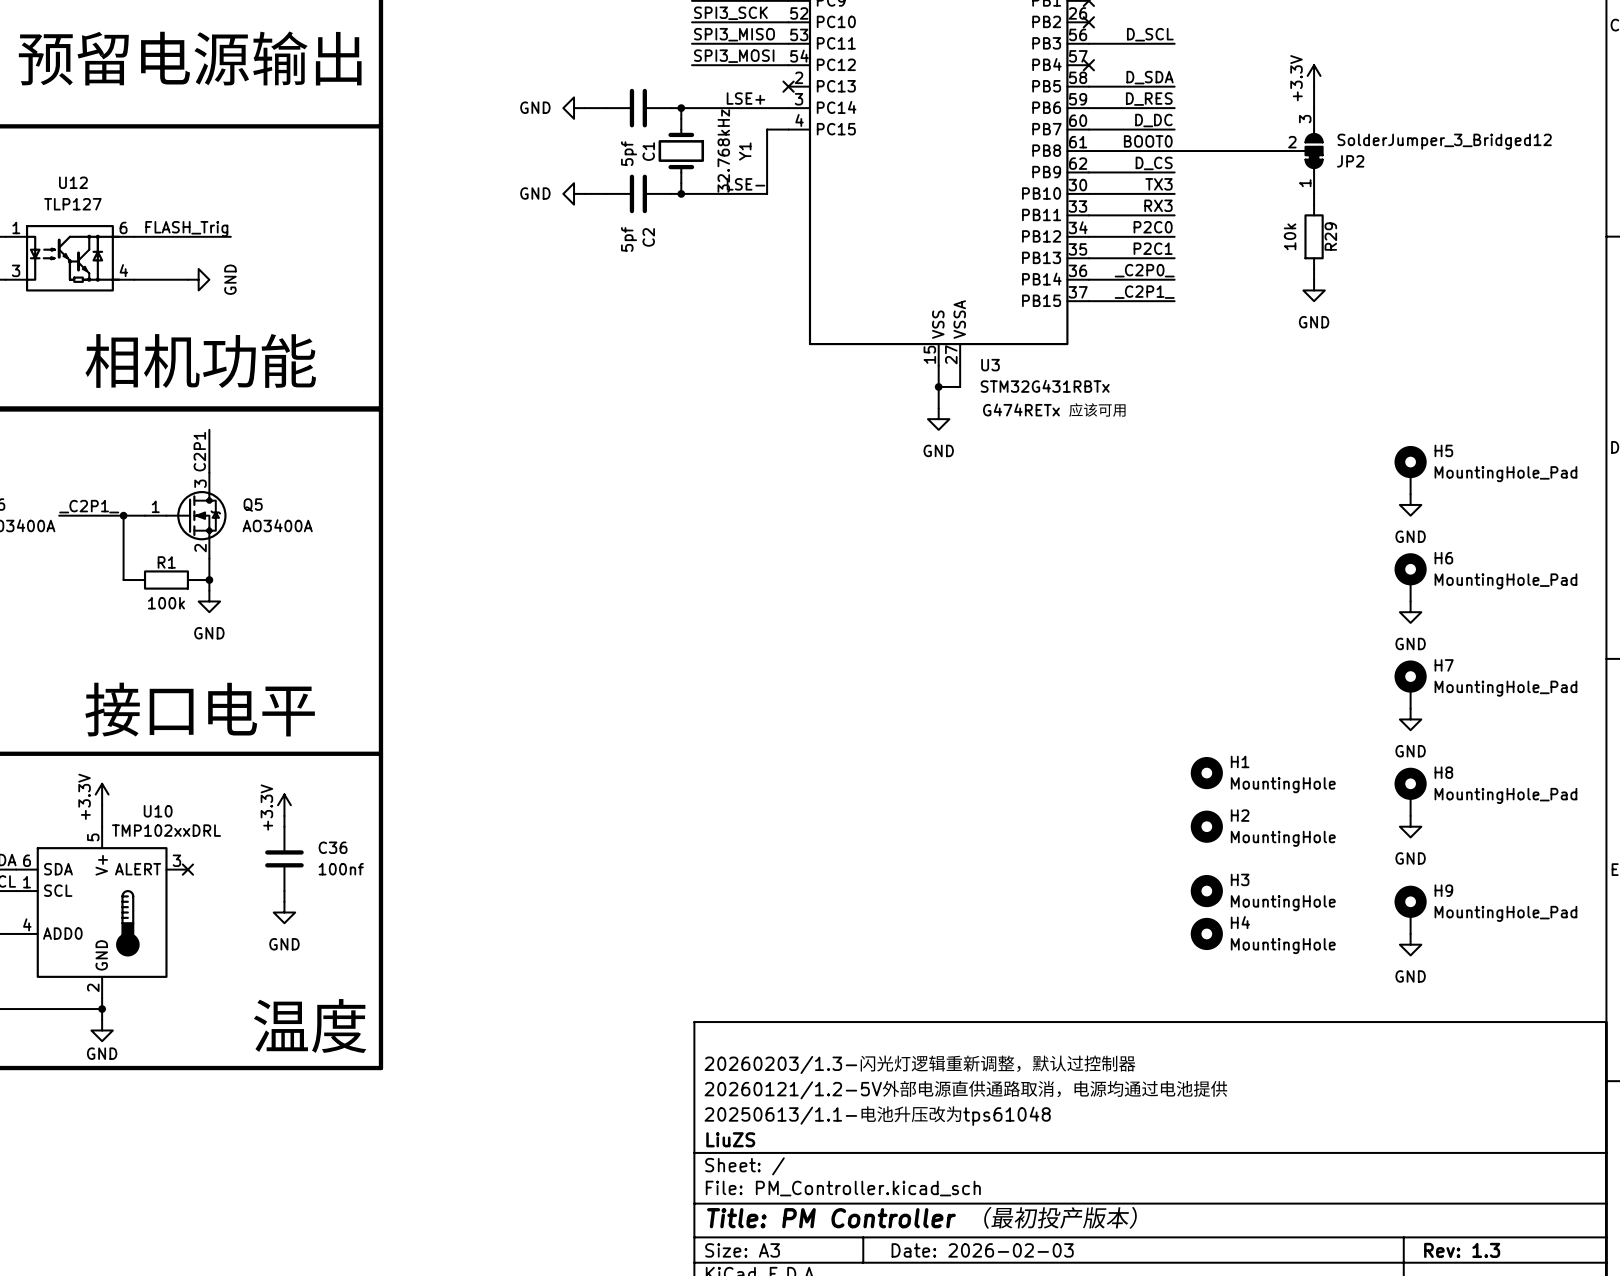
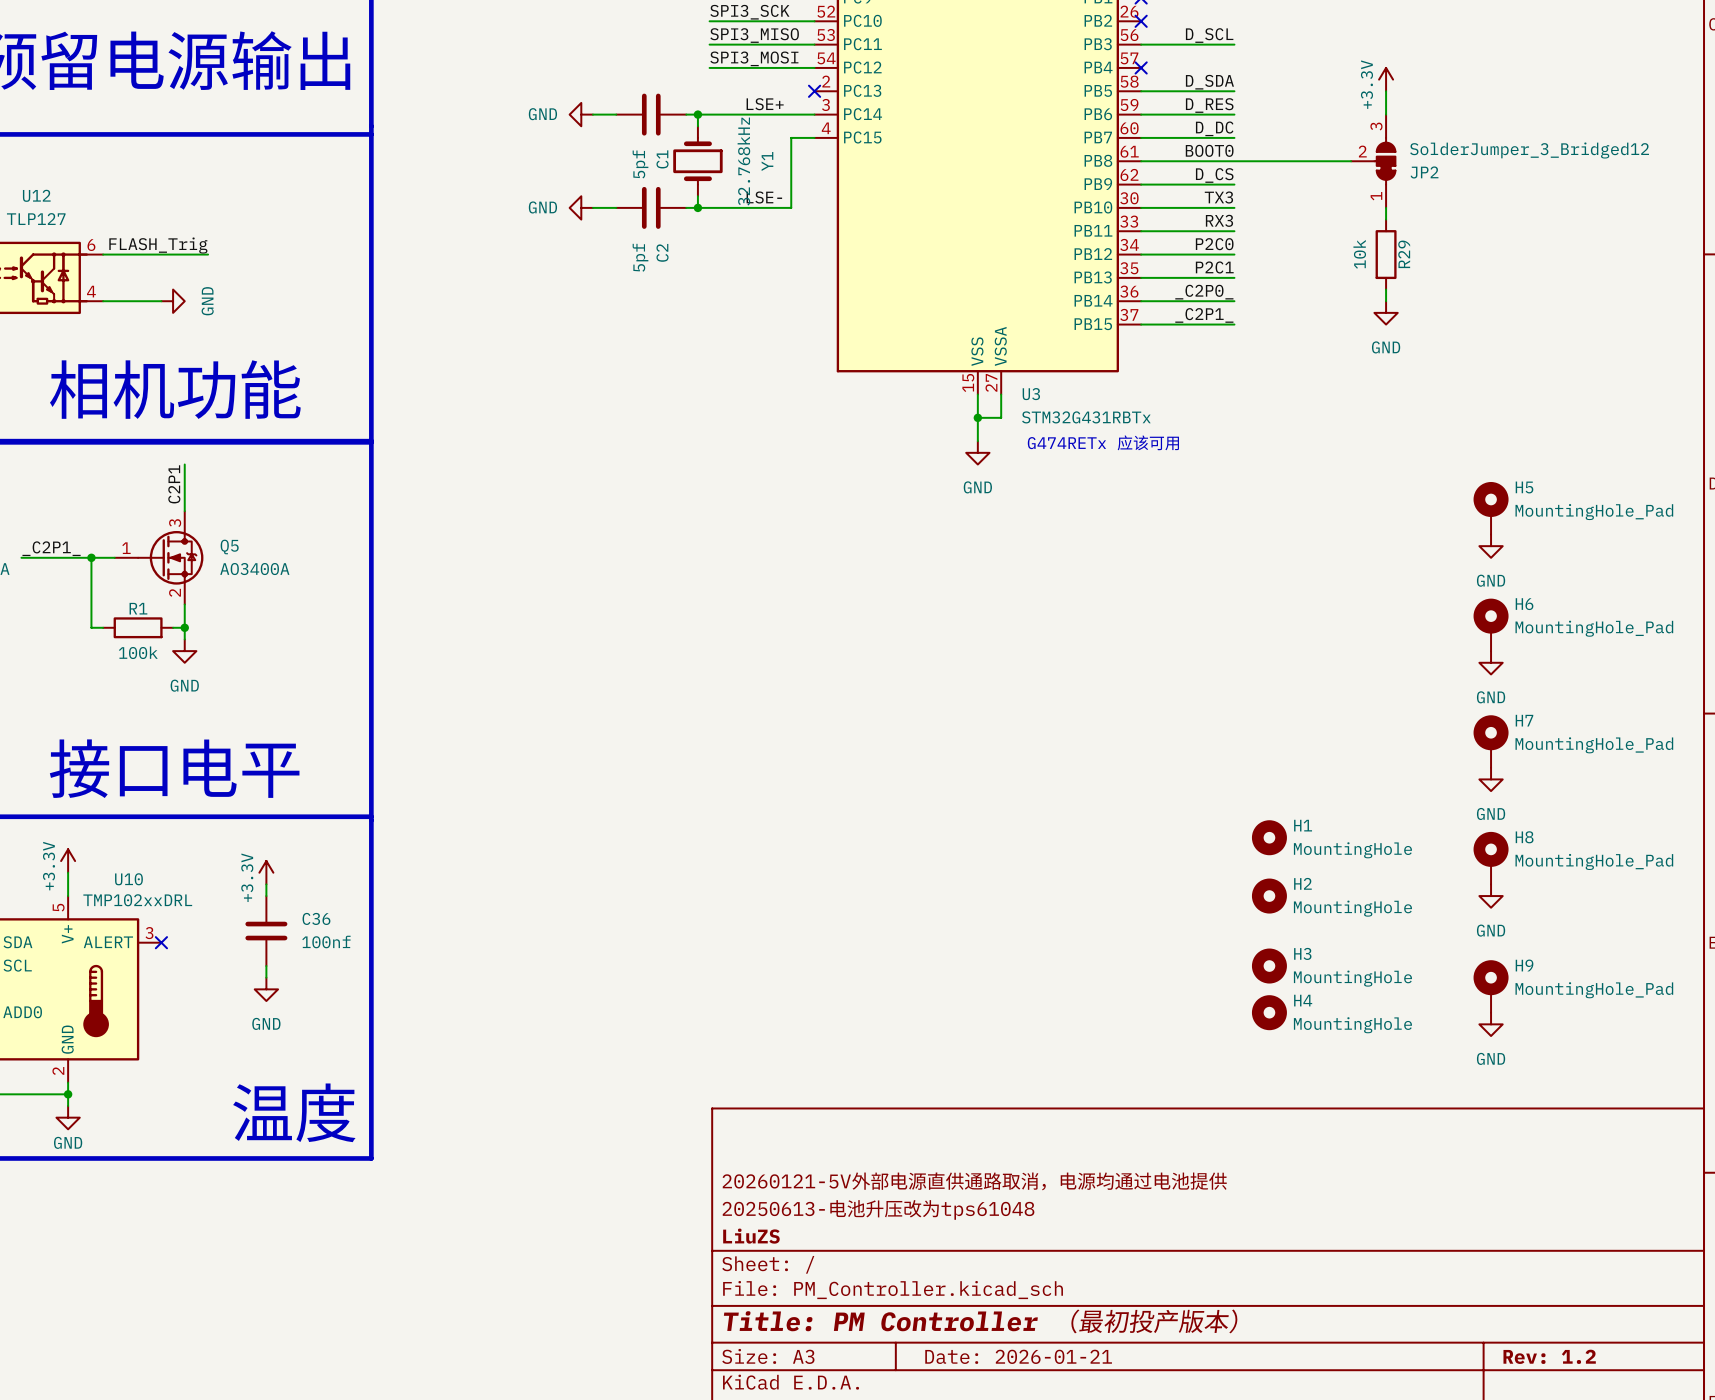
title block: 20260203/1.3-闪光灯逻辑重新调整，默认过控制器 (920, 1064) -> none
title block: 20260121/1.2-5V外部电源直供通路取消，电源均通过电池提供 (966, 1089) -> 20260121-5V外部电源直供通路取消，电源均通过电池提供 (974, 1181)
title block: 20250613/1.1-电池升压改为tps61048 (877, 1115) -> 20250613-电池升压改为tps61048 (878, 1209)
title block: Date: 2026-02-03 (982, 1250) -> Date: 2026-01-21 (1018, 1356)
title block: Rev: 1.3 (1462, 1250) -> Rev: 1.2 (1549, 1356)

